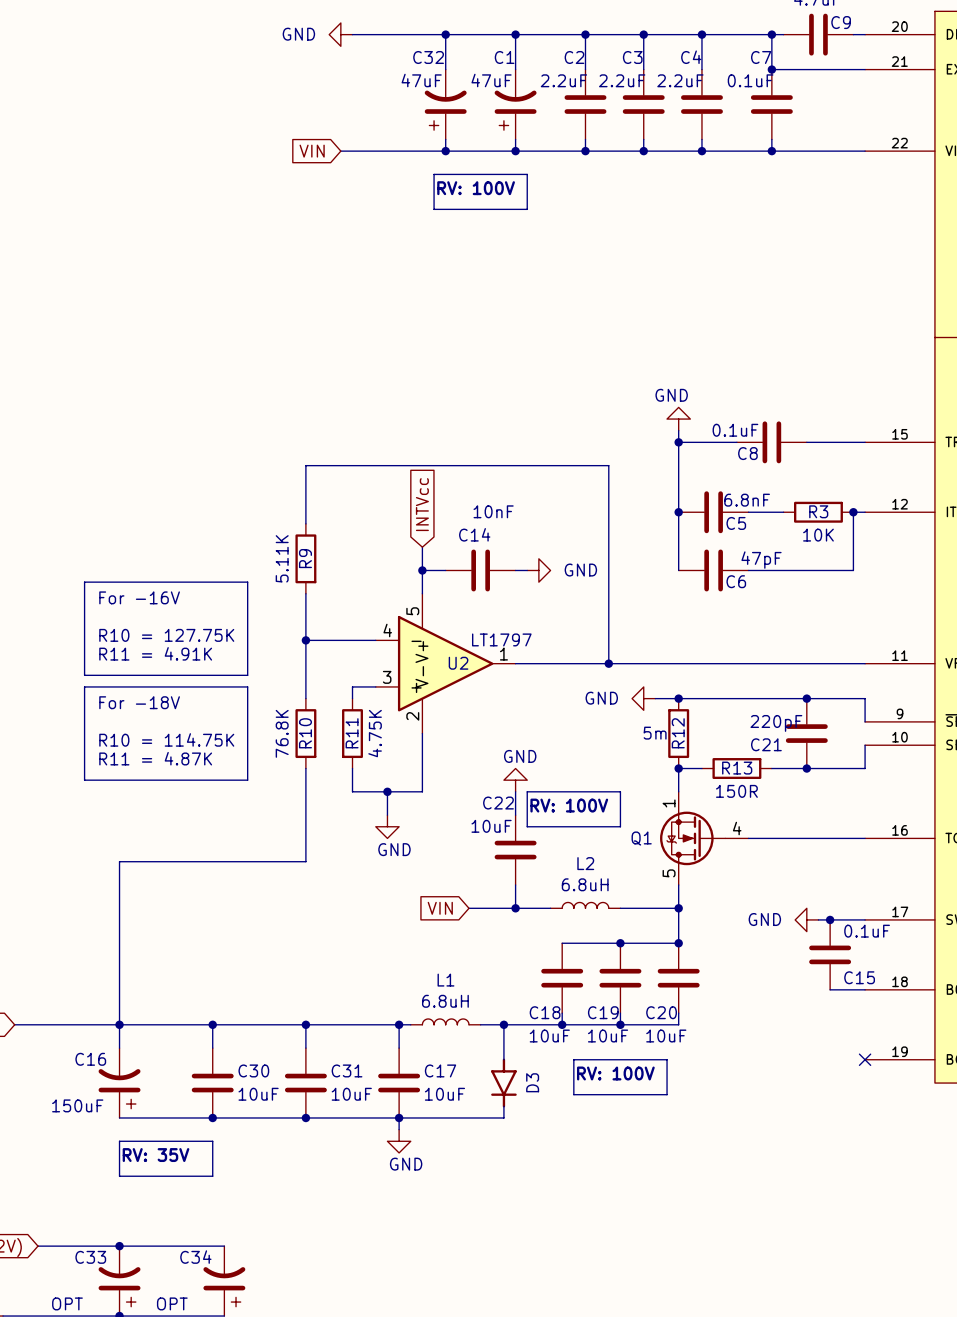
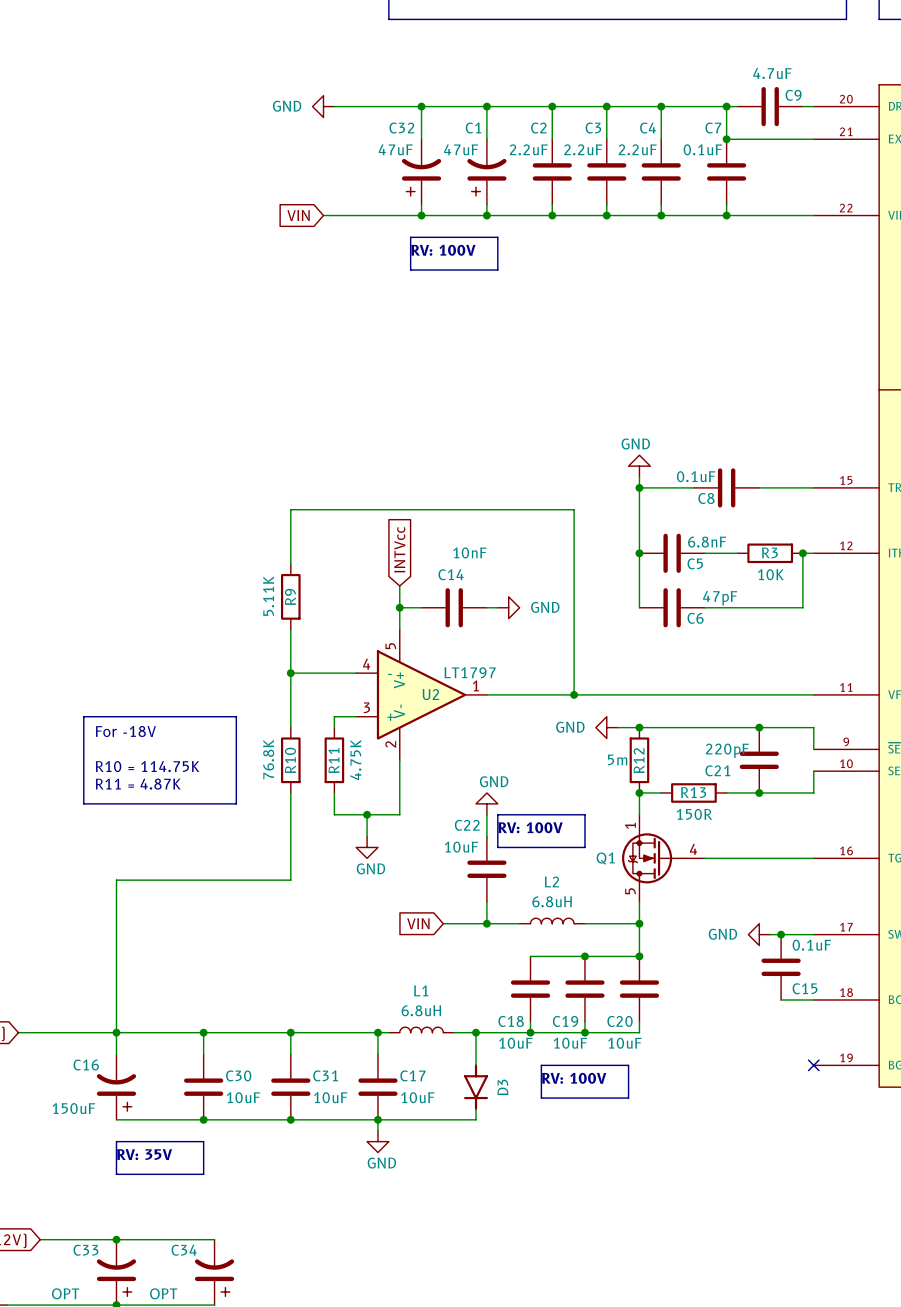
line: (84, 582) (84, 675) (247, 675) (247, 582) (84, 582) -> none
text: For -16V (139, 597) -> none
text: R10 = 127.75K (166, 635) -> none
text: R11 = 4.91K (155, 653) -> none

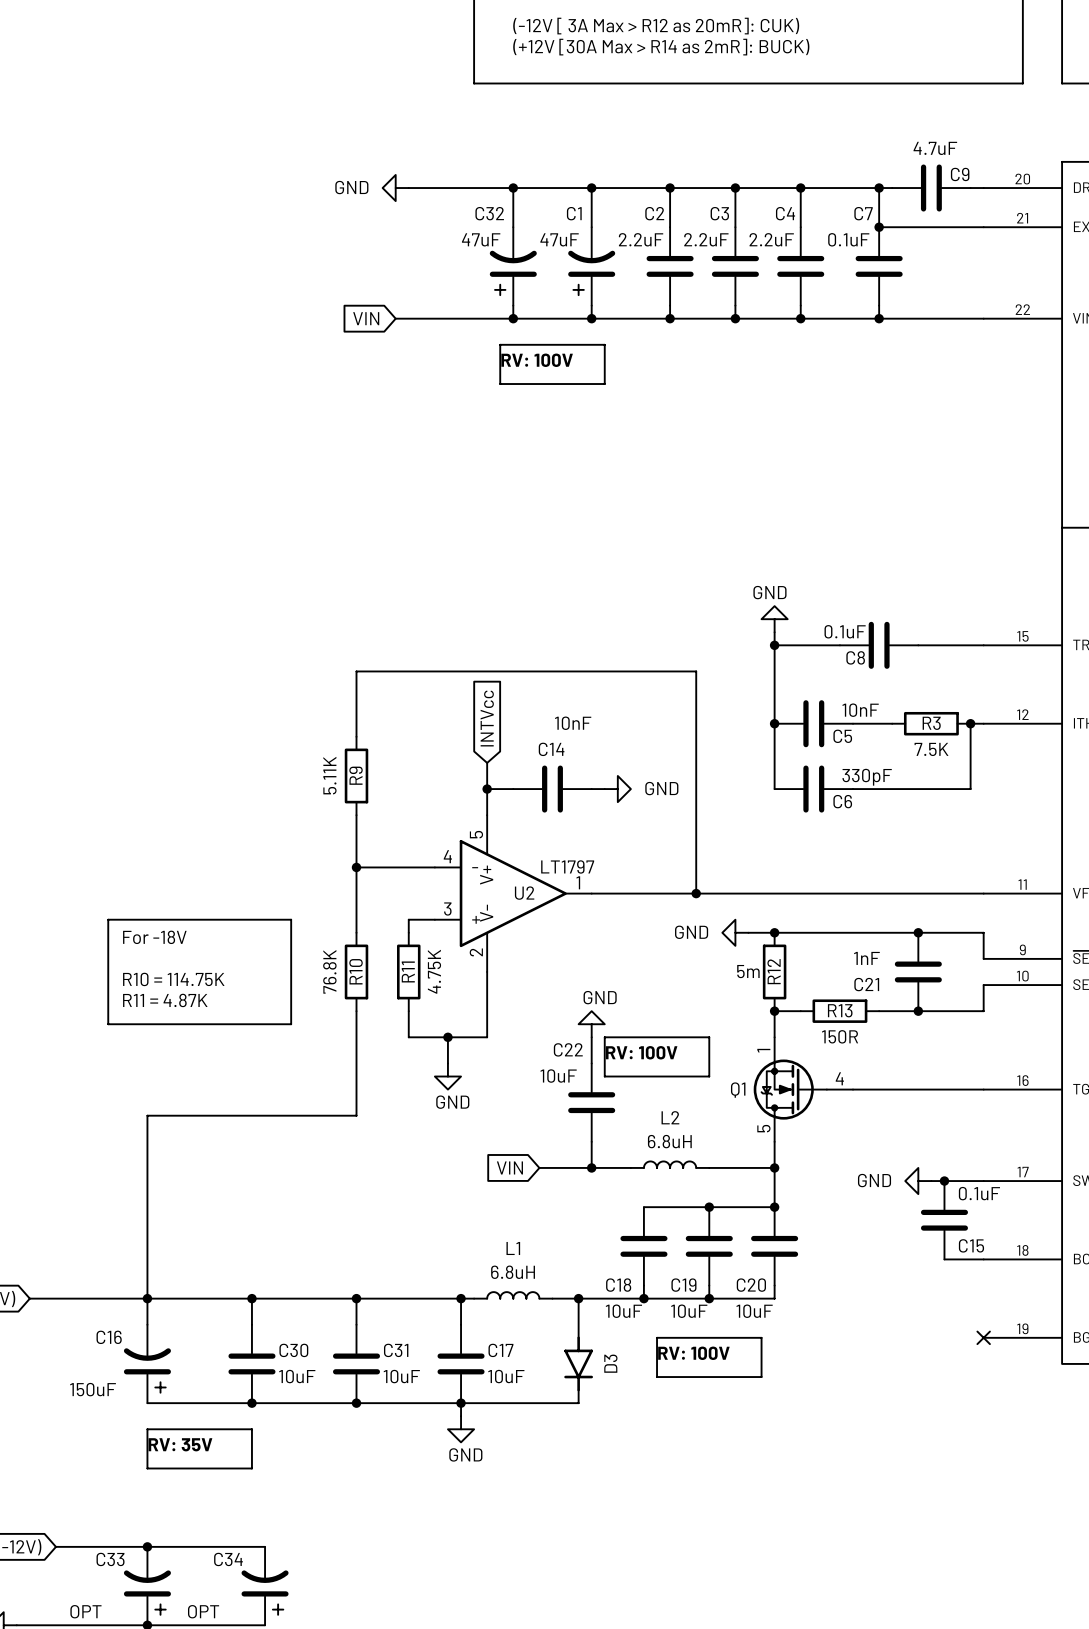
C5 value: 6.8nF (707, 542) -> 10nF (860, 710)
R3 value: 10K (770, 574) -> 7.5K (931, 749)
C6 value: 47pF (720, 598) -> 330pF (867, 777)
C21 value: 220pF (727, 750) -> 1nF (866, 958)

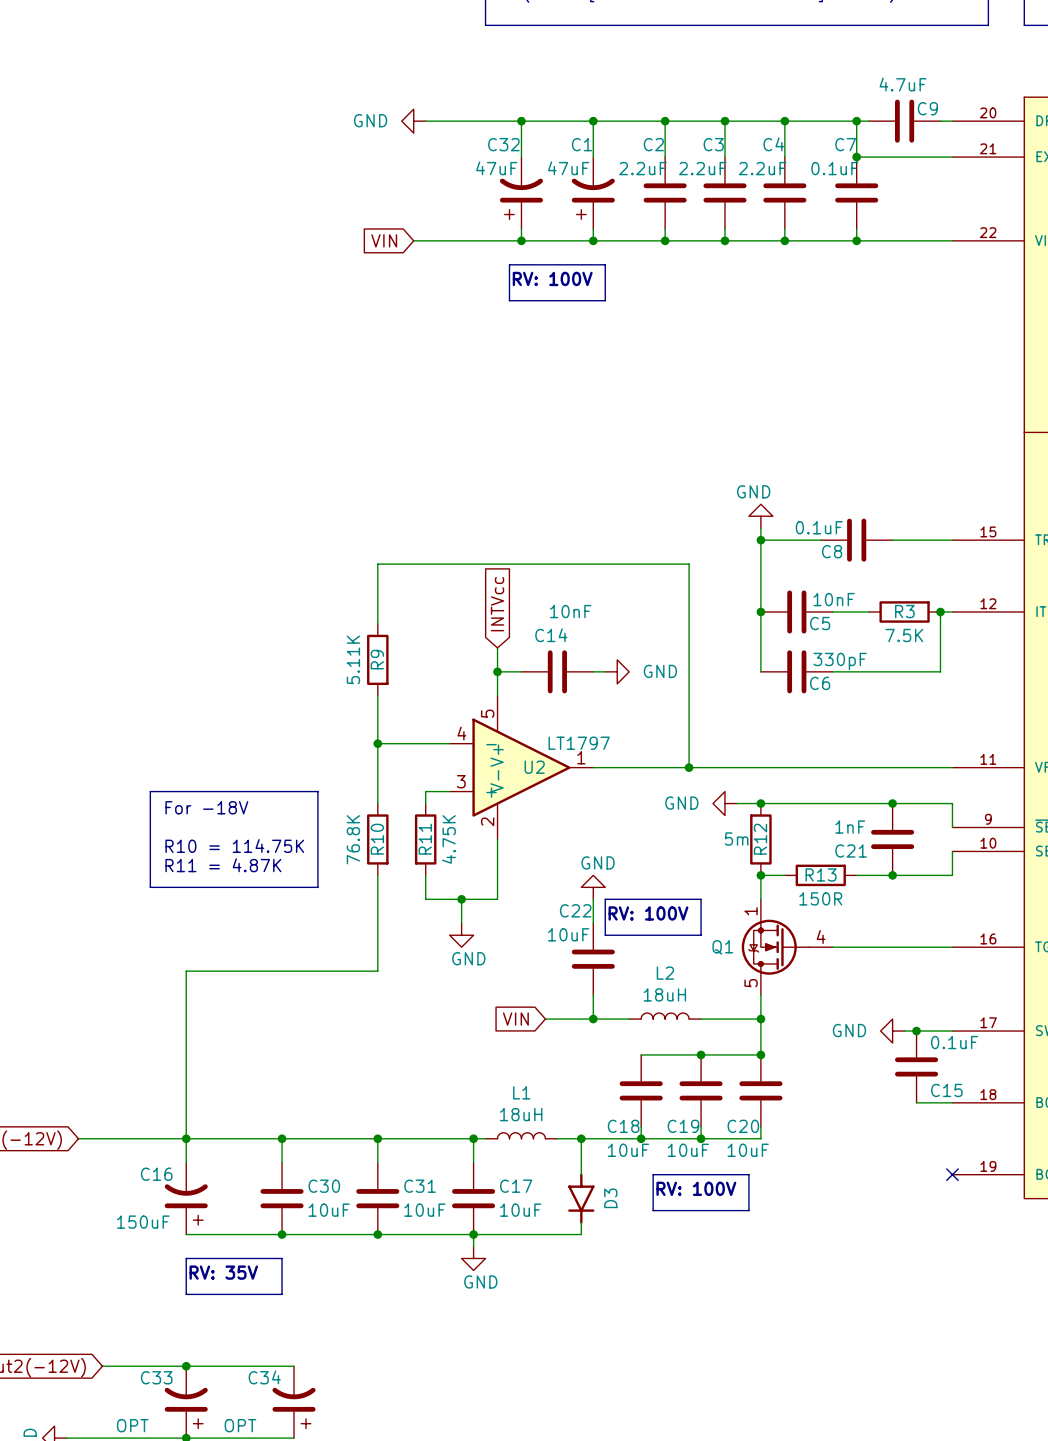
L2 value: 6.8uH (669, 1141) -> 18uH (664, 994)
L1 value: 6.8uH (513, 1272) -> 18uH (521, 1114)

